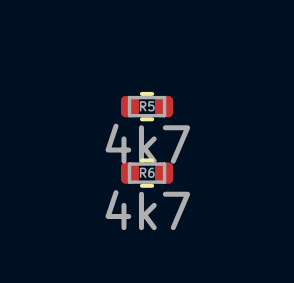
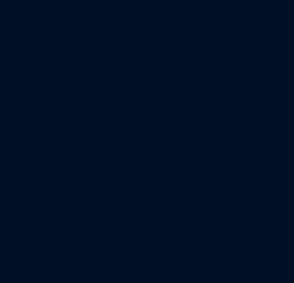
R5: 4k7 (147, 106) -> none
R6: 4k7 (147, 173) -> none

